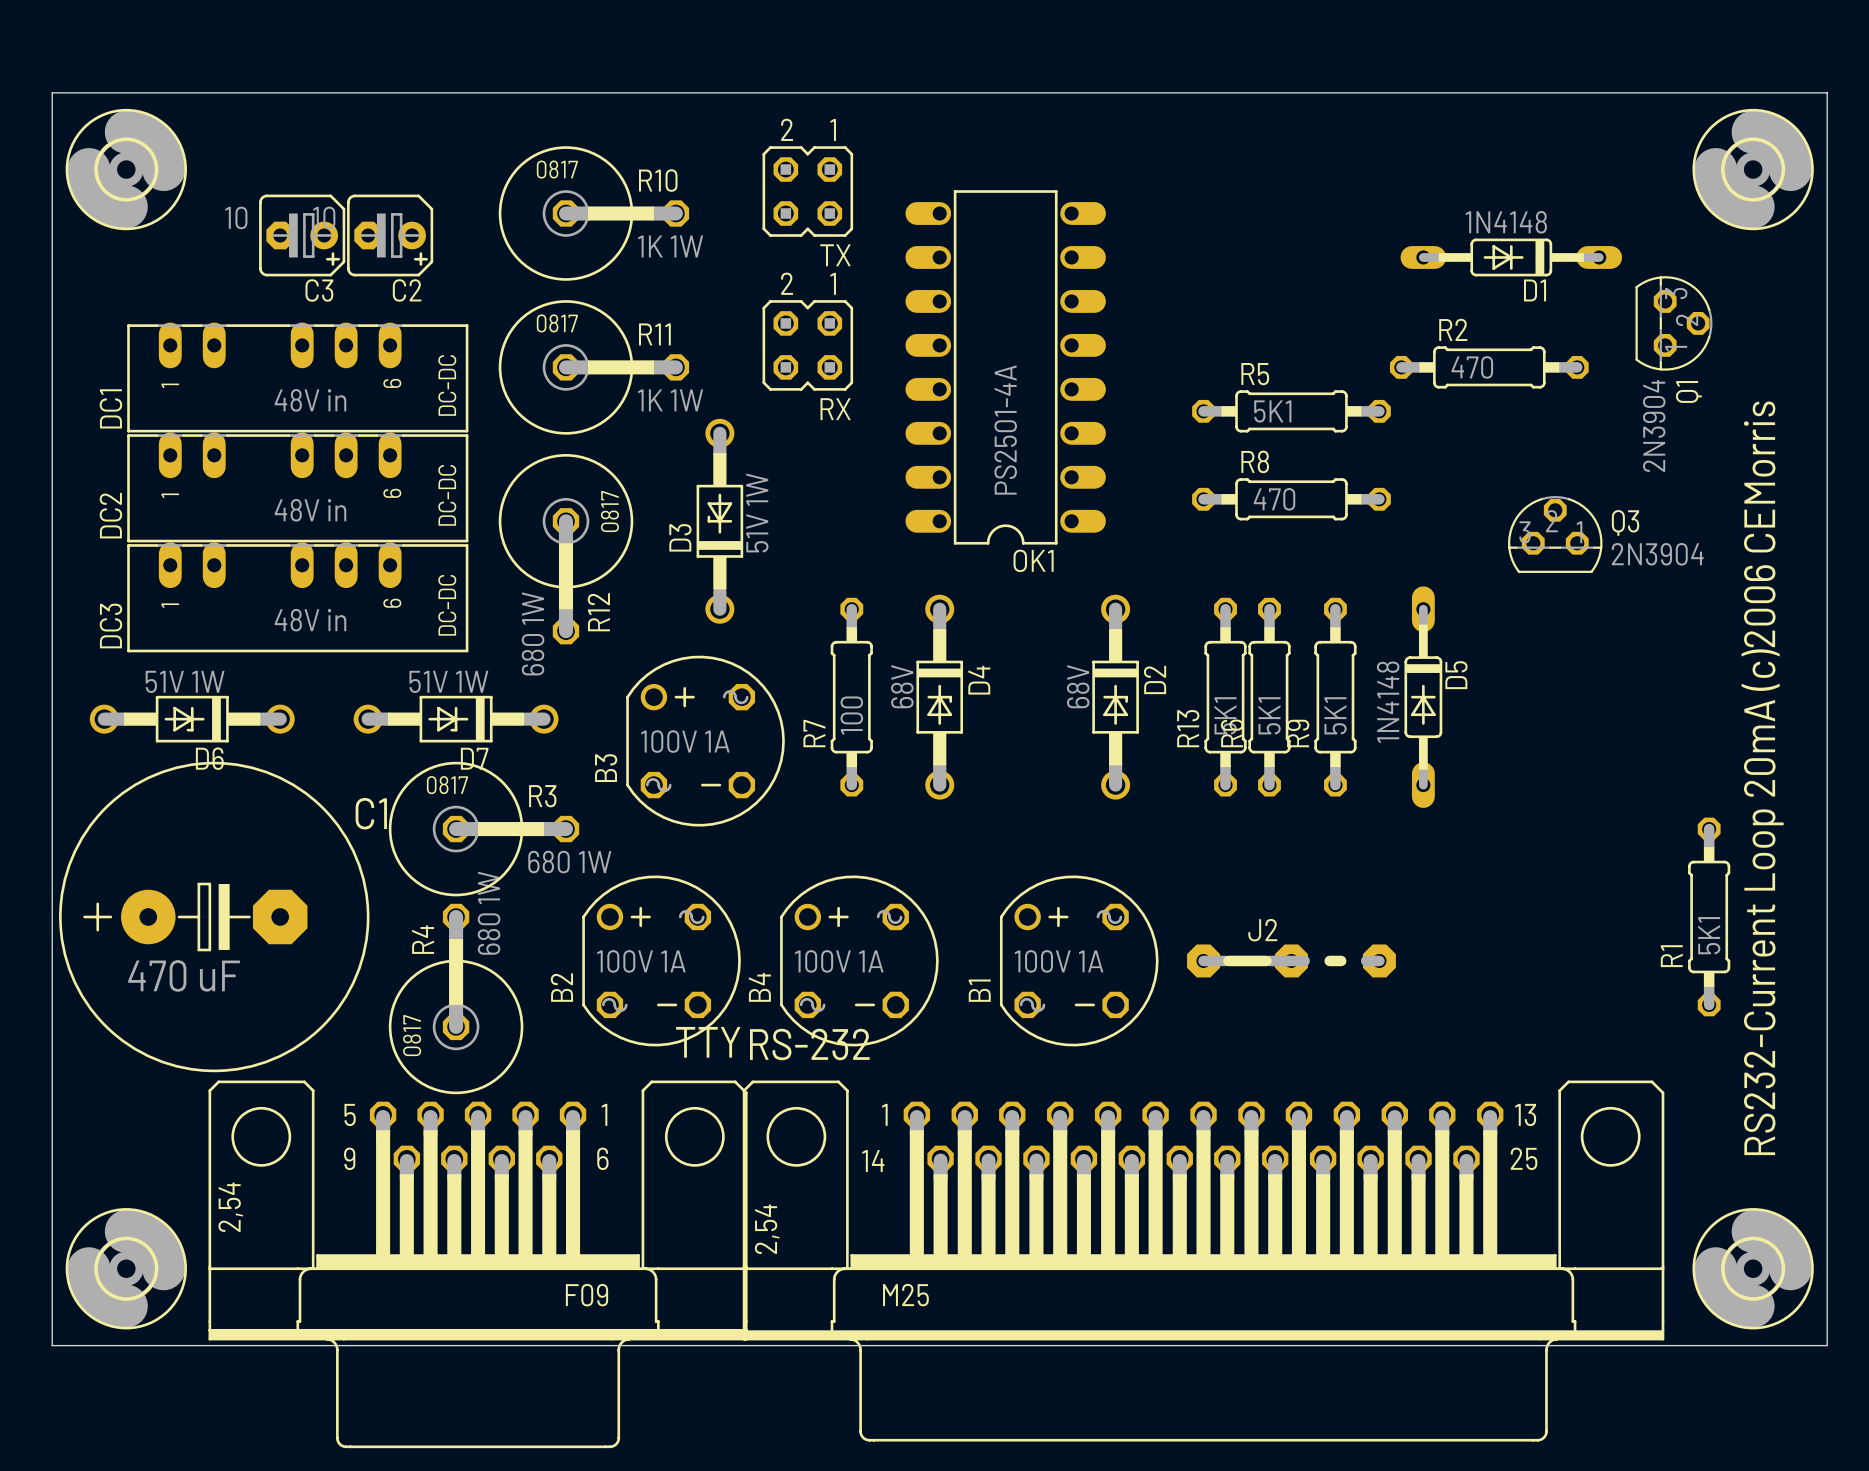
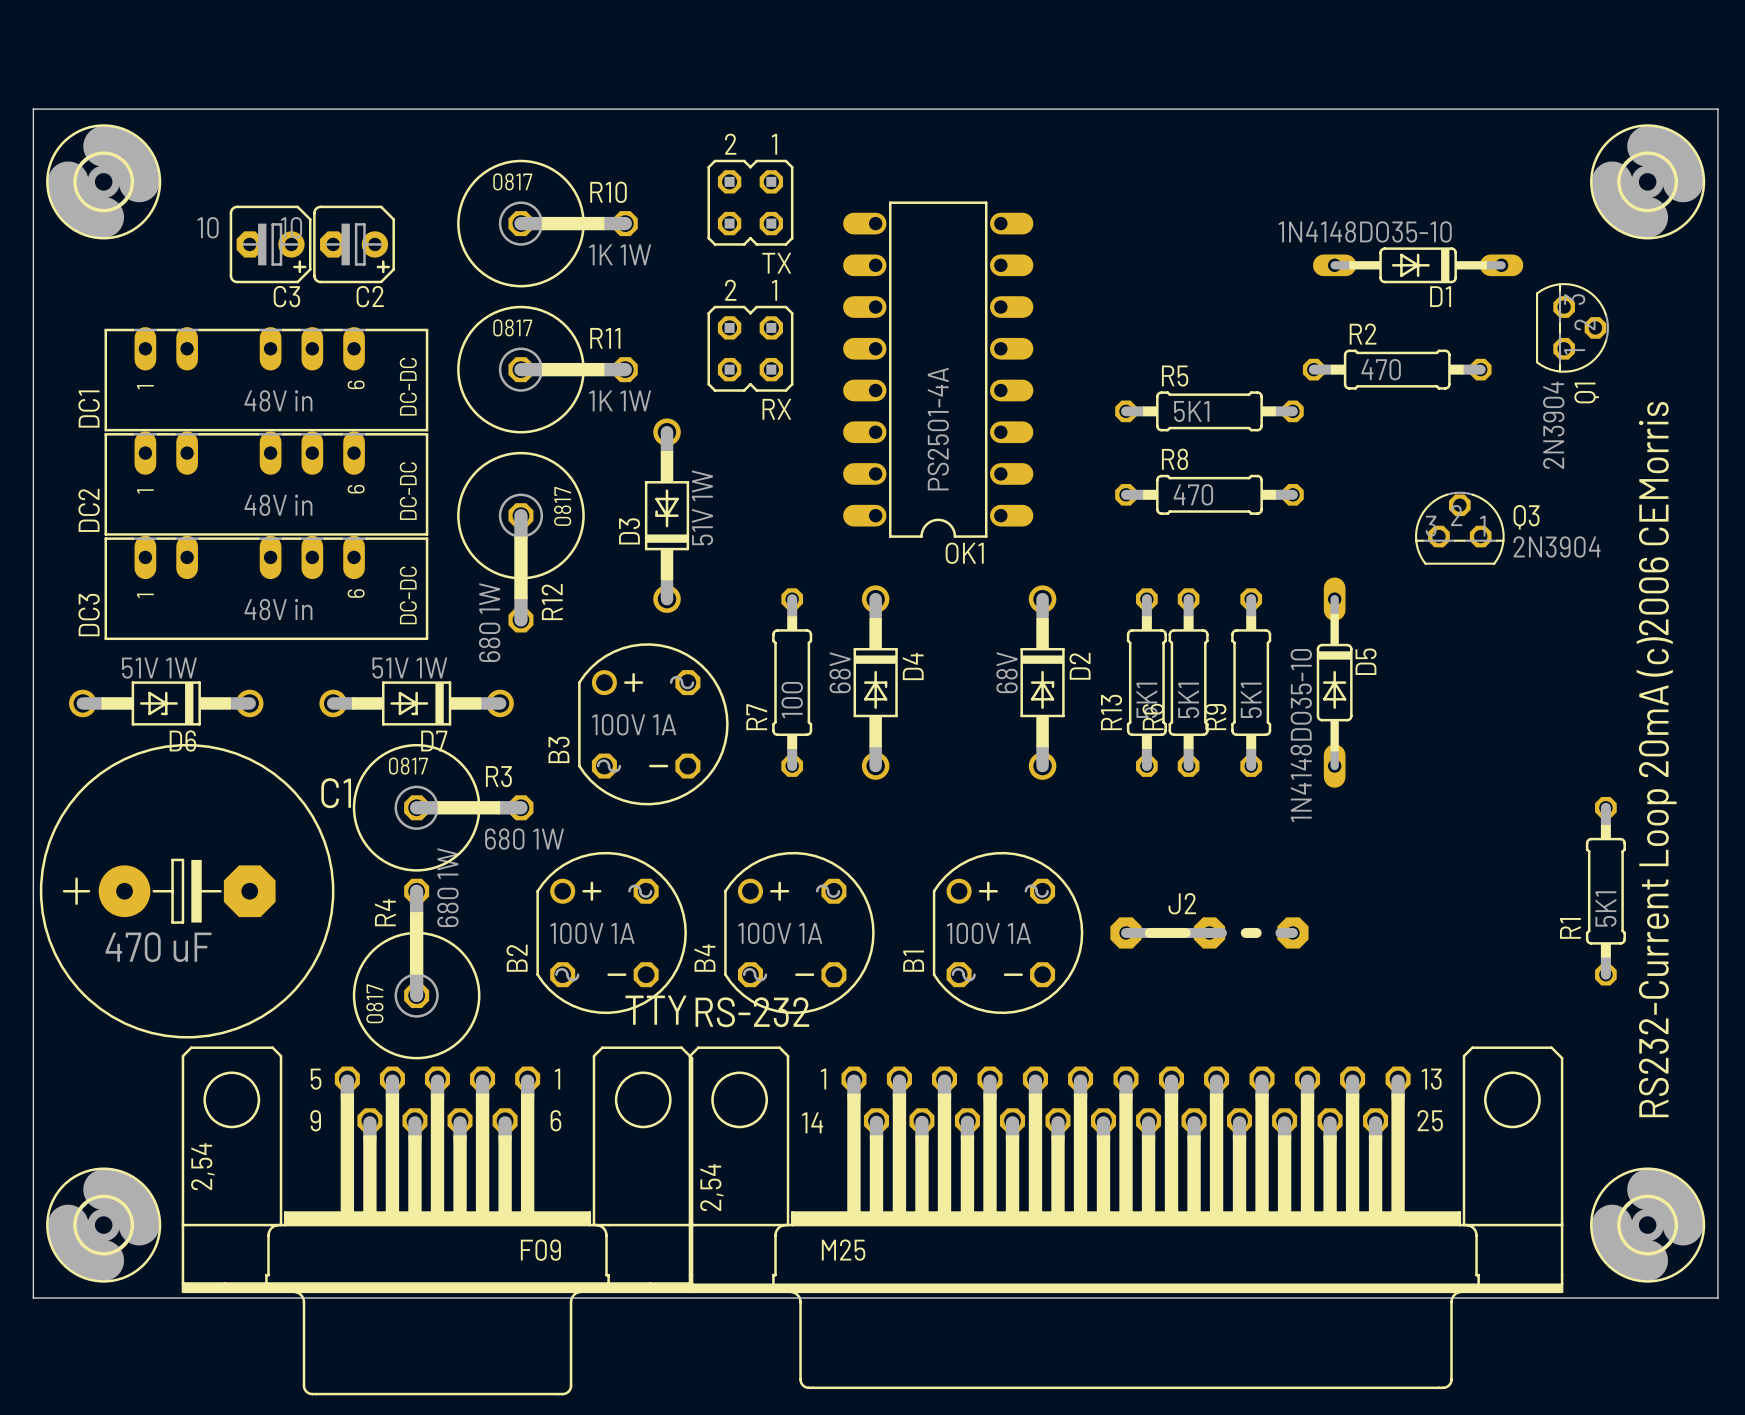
D1 value: 1N4148 (1506, 222) -> 1N4148DO35-10 (1365, 231)
D5 value: 1N4148 (1388, 702) -> 1N4148DO35-10 (1301, 735)

